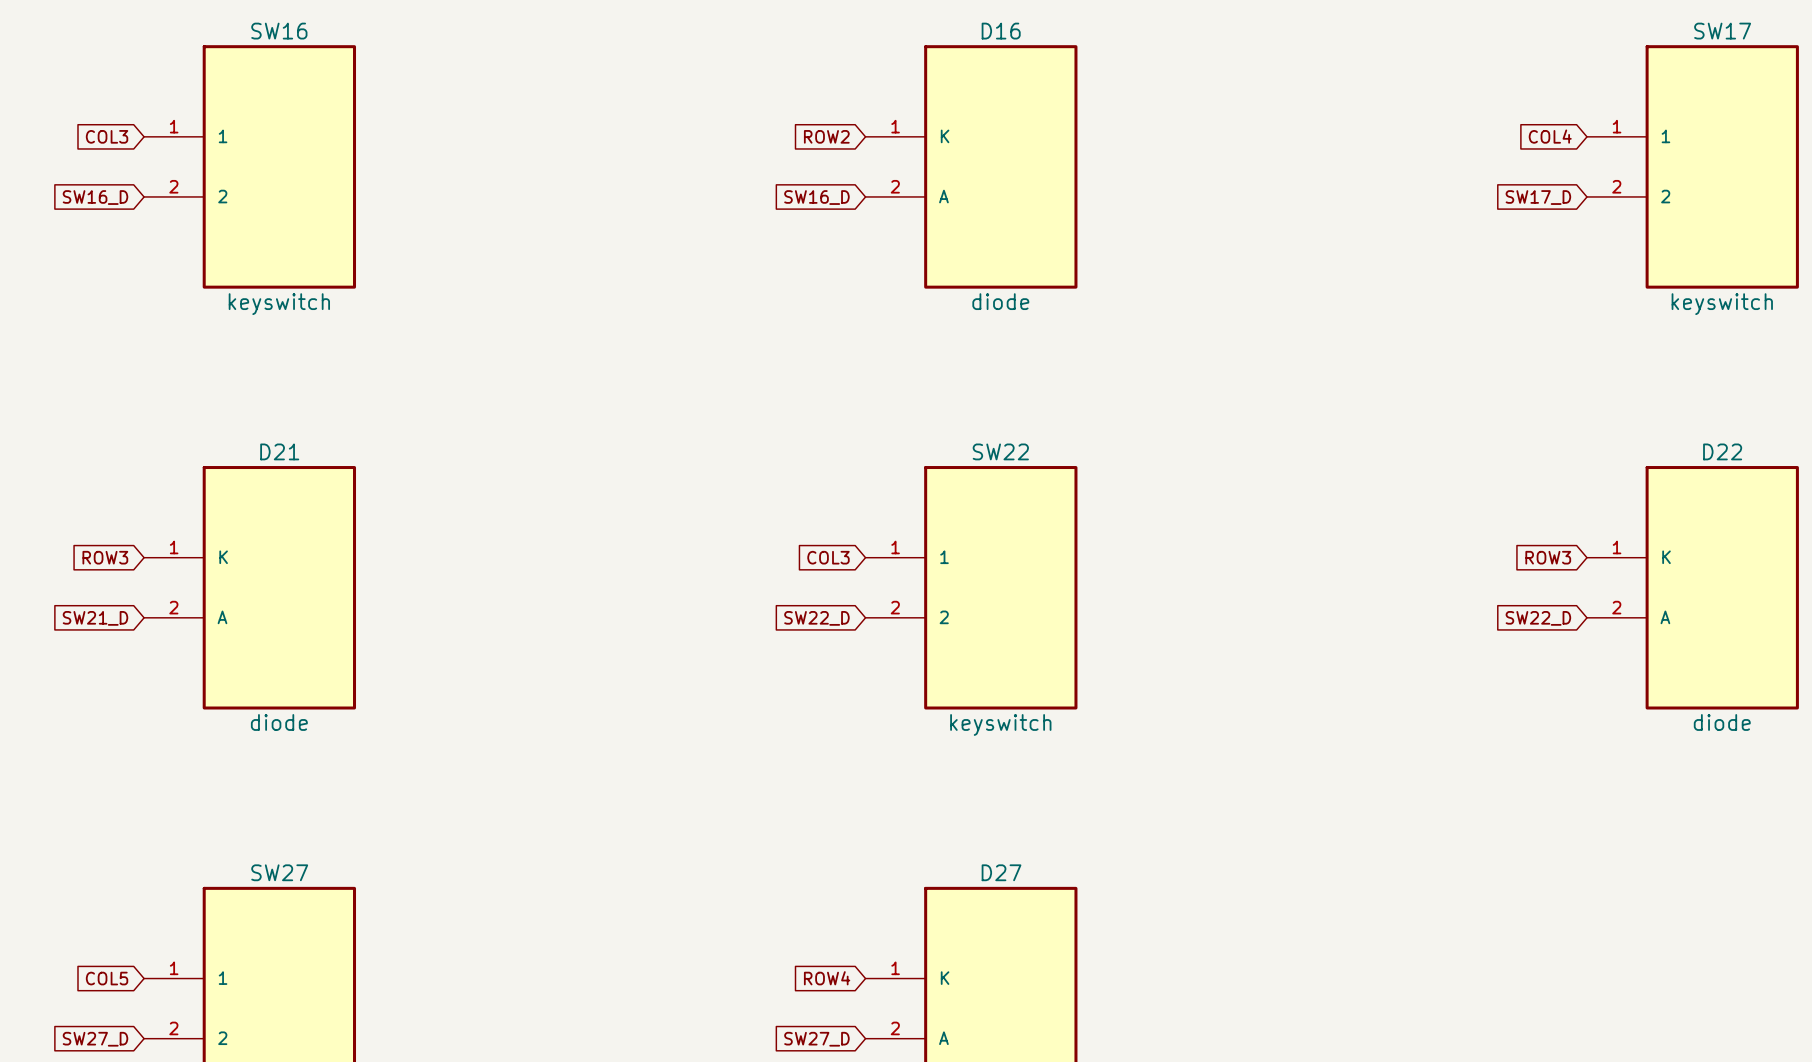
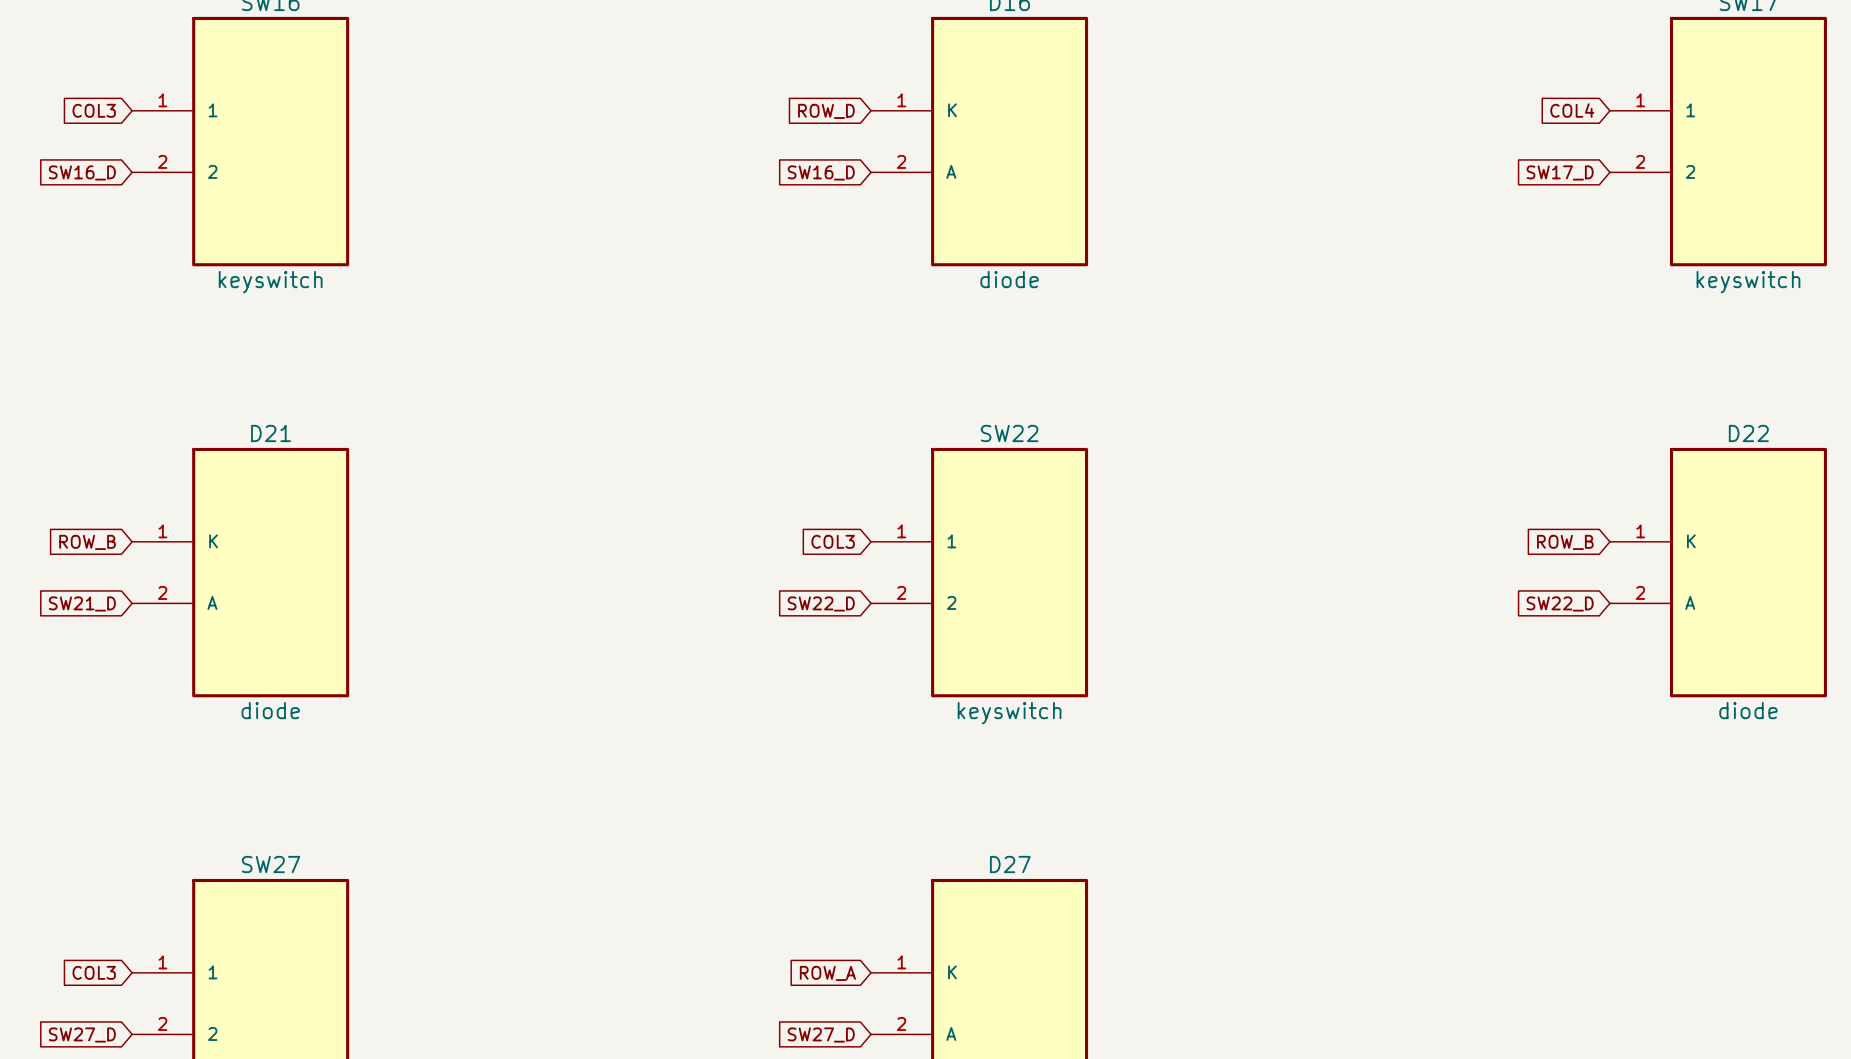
global label: ROW2 (826, 136) -> ROW_D (826, 111)
global label: ROW3 (105, 557) -> ROW_B (87, 542)
global label: ROW3 (1548, 557) -> ROW_B (1565, 542)
global label: COL5 (107, 978) -> COL3 (94, 972)
global label: ROW4 (827, 978) -> ROW_A (827, 973)

